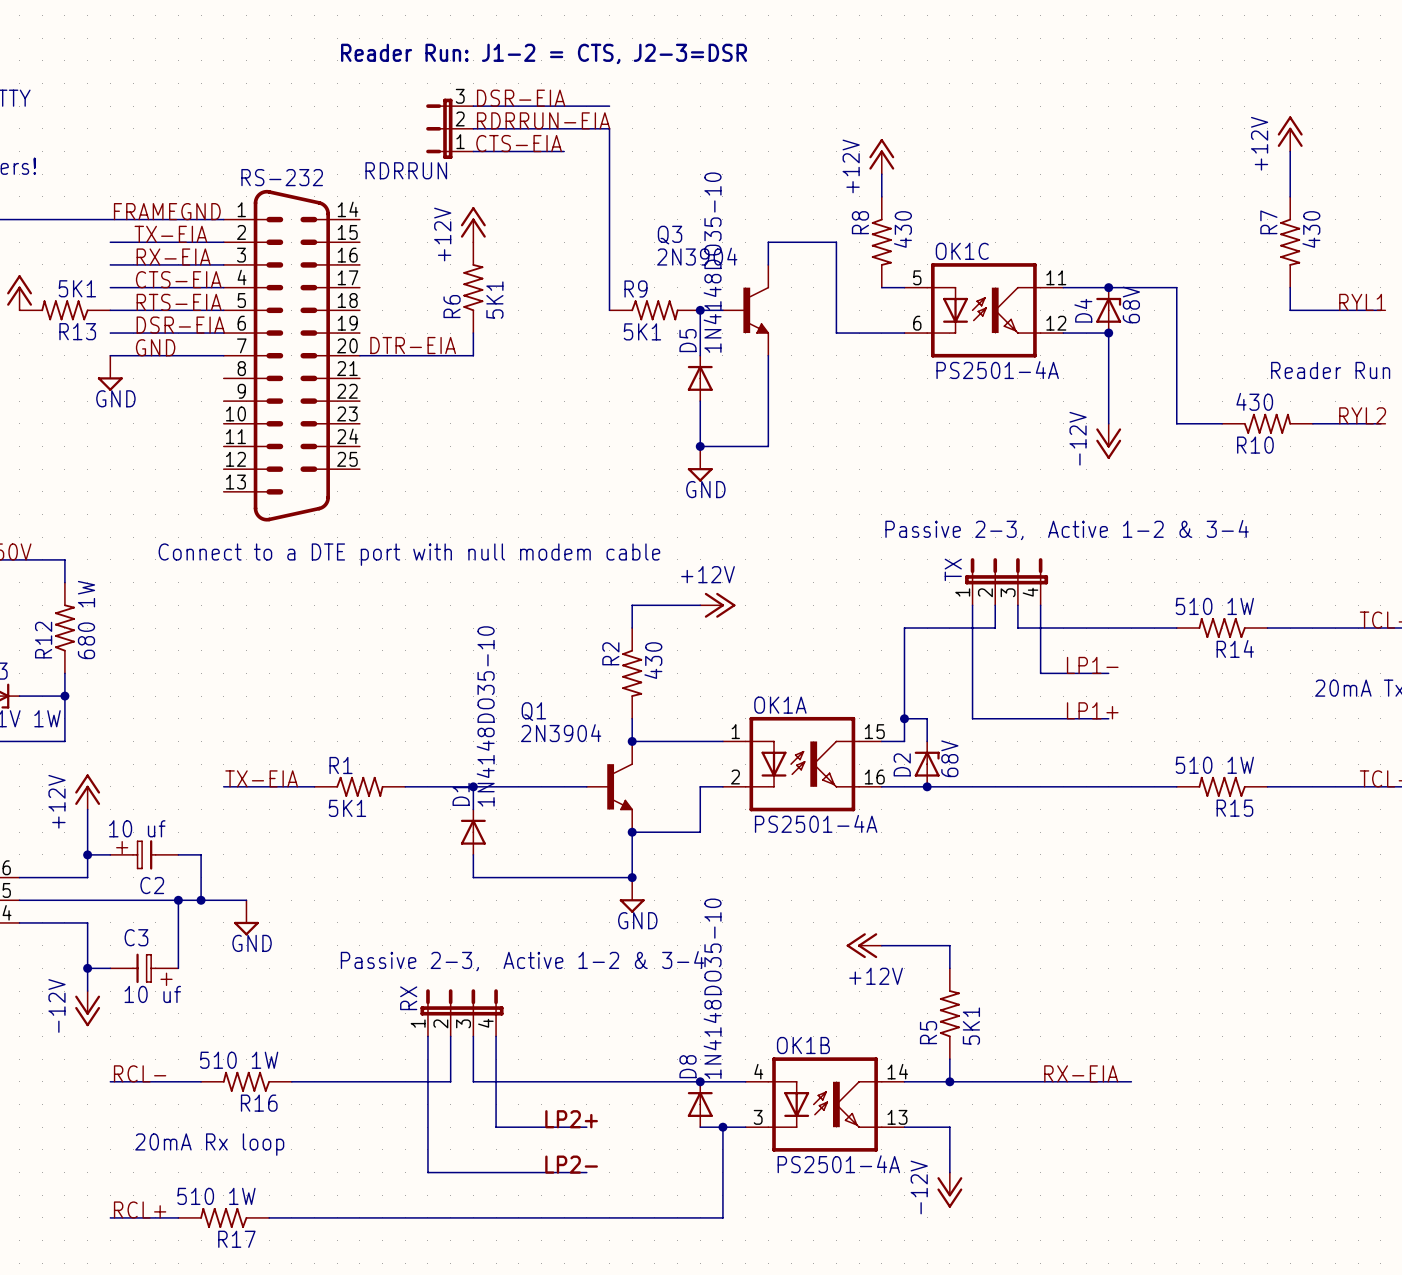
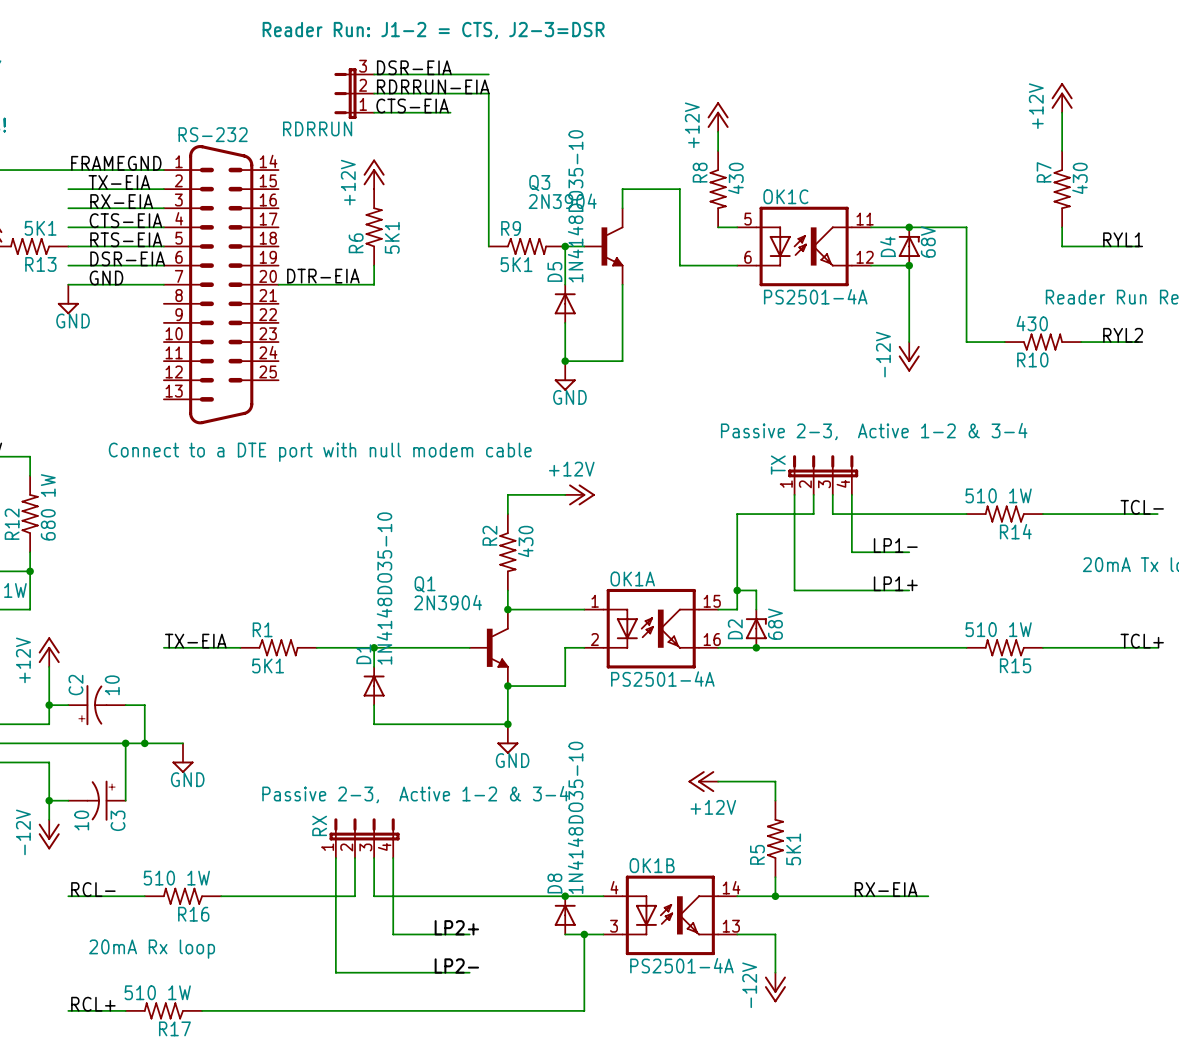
C2 value: 10 uf (137, 828) -> 10 (112, 685)
C2 symbol: [110, 840, 179, 870] -> [68, 685, 126, 726]
C2 name position: C2 (152, 885) -> C2 (75, 685)
C3 name position: C3 (136, 937) -> C3 (118, 820)
C3 symbol: [110, 953, 179, 984] -> [68, 780, 126, 821]
C3 value: 10 uf (152, 994) -> 10 (81, 820)

